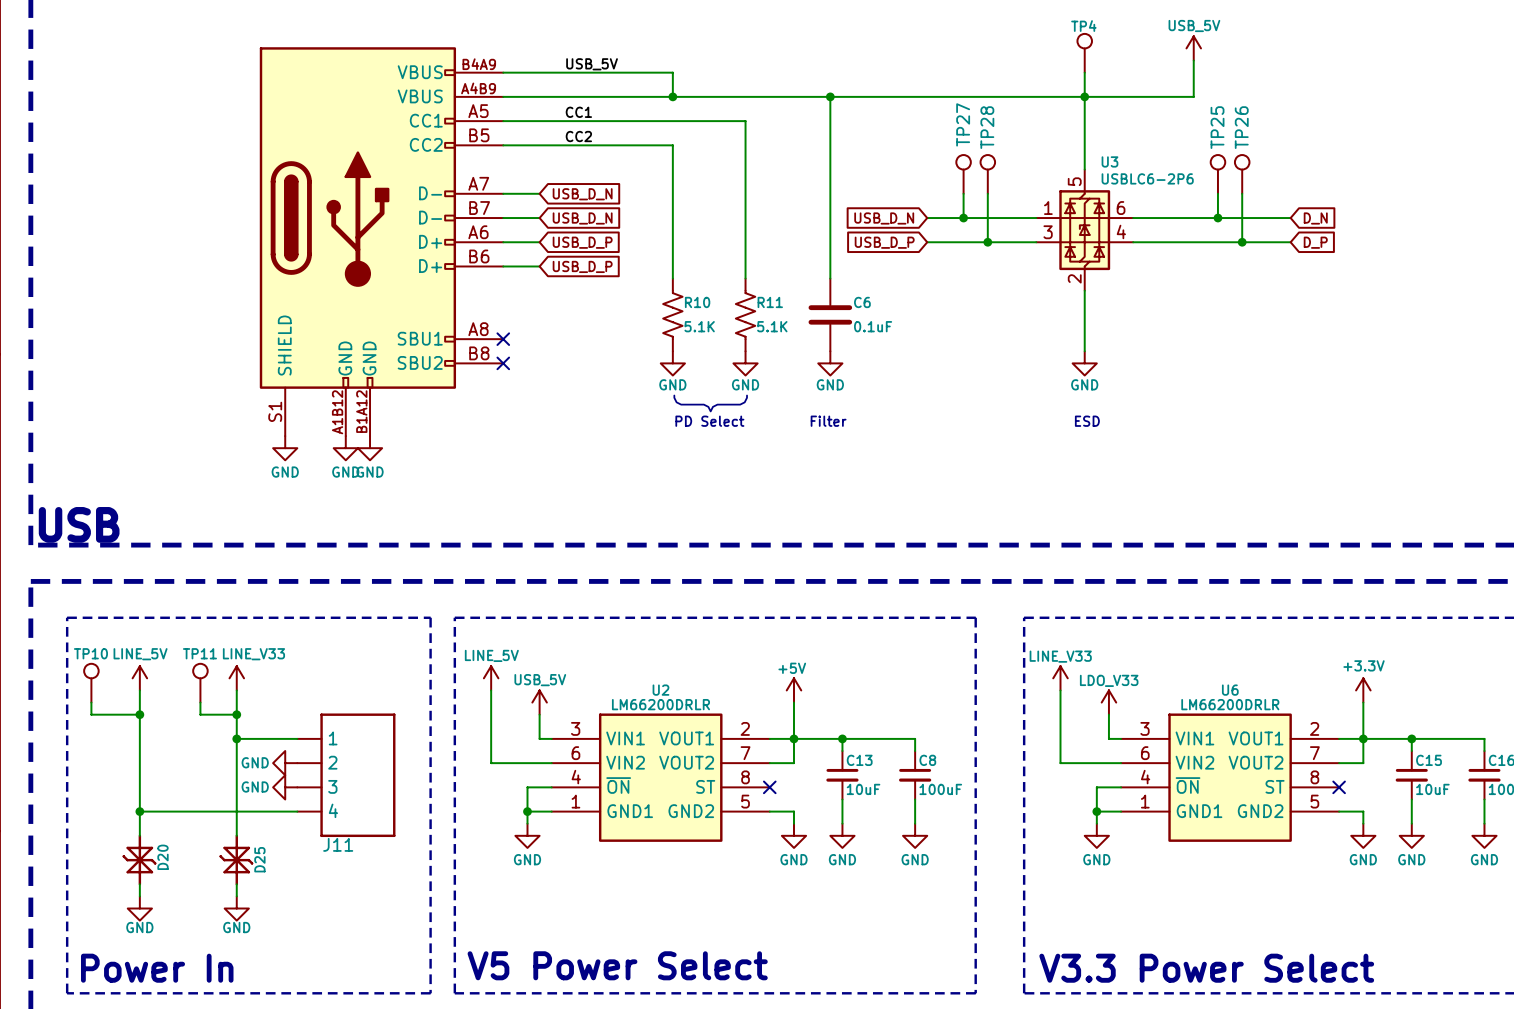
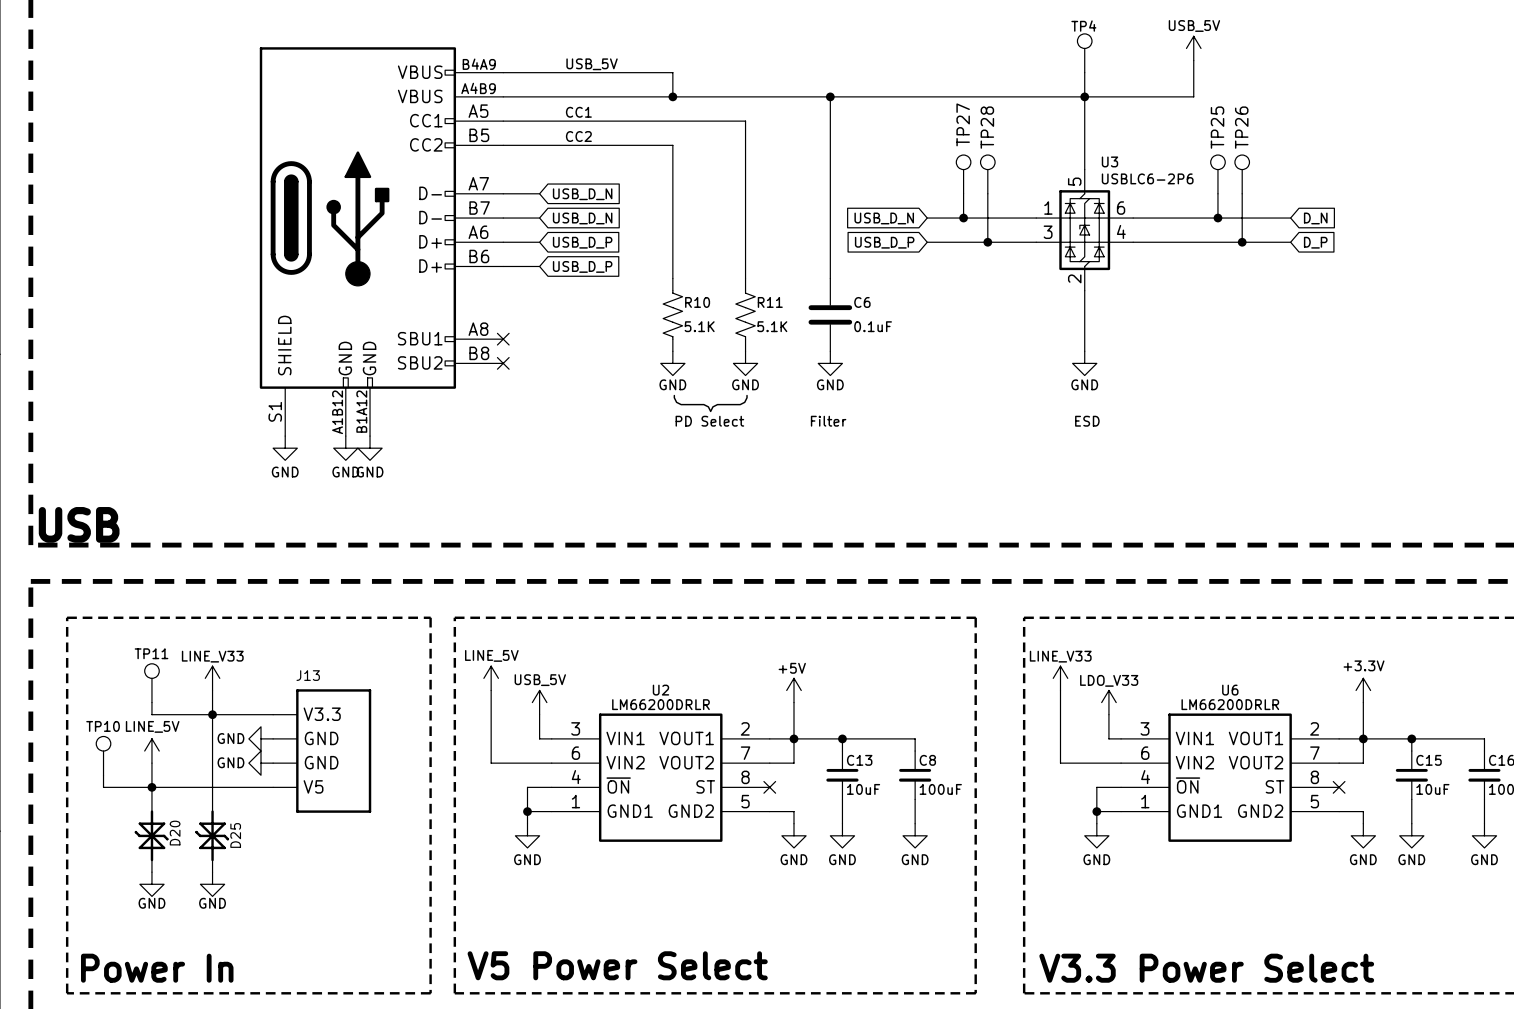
power symbol text position: LINE_V33 (253, 654) -> LINE_V33 (212, 656)
power symbol position: LINE_5V (139, 678) -> LINE_5V (151, 751)
power symbol position: LINE_V33 (236, 678) -> LINE_V33 (212, 678)
TP10 position: (91, 683) -> (103, 755)
TP11 position: (200, 683) -> (151, 683)
wire: (139, 690) (139, 835) -> none
wire: none -> (212, 690) (212, 811)
wire: (236, 690) (236, 835) -> none
wire: (91, 702) (91, 714) (139, 714) -> none
wire: (200, 702) (200, 714) -> (151, 702) (151, 714) (200, 714)
junction: (139, 714) -> none
junction: none -> (212, 714)
wire: none -> (236, 714) (273, 714)
junction: (236, 714) -> none
junction: (236, 738) -> none
power symbol: none -> GND (260, 738)
J13: none -> (322, 751)
wire: none -> (151, 763) (151, 811)
power symbol: none -> GND (260, 763)
power symbol: GND (285, 763) -> none
wire: none -> (103, 775) (103, 787) (273, 787)
J11: (346, 775) -> none
power symbol: GND (285, 787) -> none
wire: (139, 811) (297, 811) -> none
junction position: (139, 811) -> (151, 787)
D20 position: (139, 860) -> (151, 835)
D25 position: (236, 860) -> (212, 835)
wire: (139, 884) (139, 896) -> (151, 860) (151, 872)
wire: (236, 884) (236, 896) -> (212, 860) (212, 872)
power symbol position: GND (139, 908) -> GND (151, 884)
power symbol position: GND (236, 908) -> GND (212, 884)

